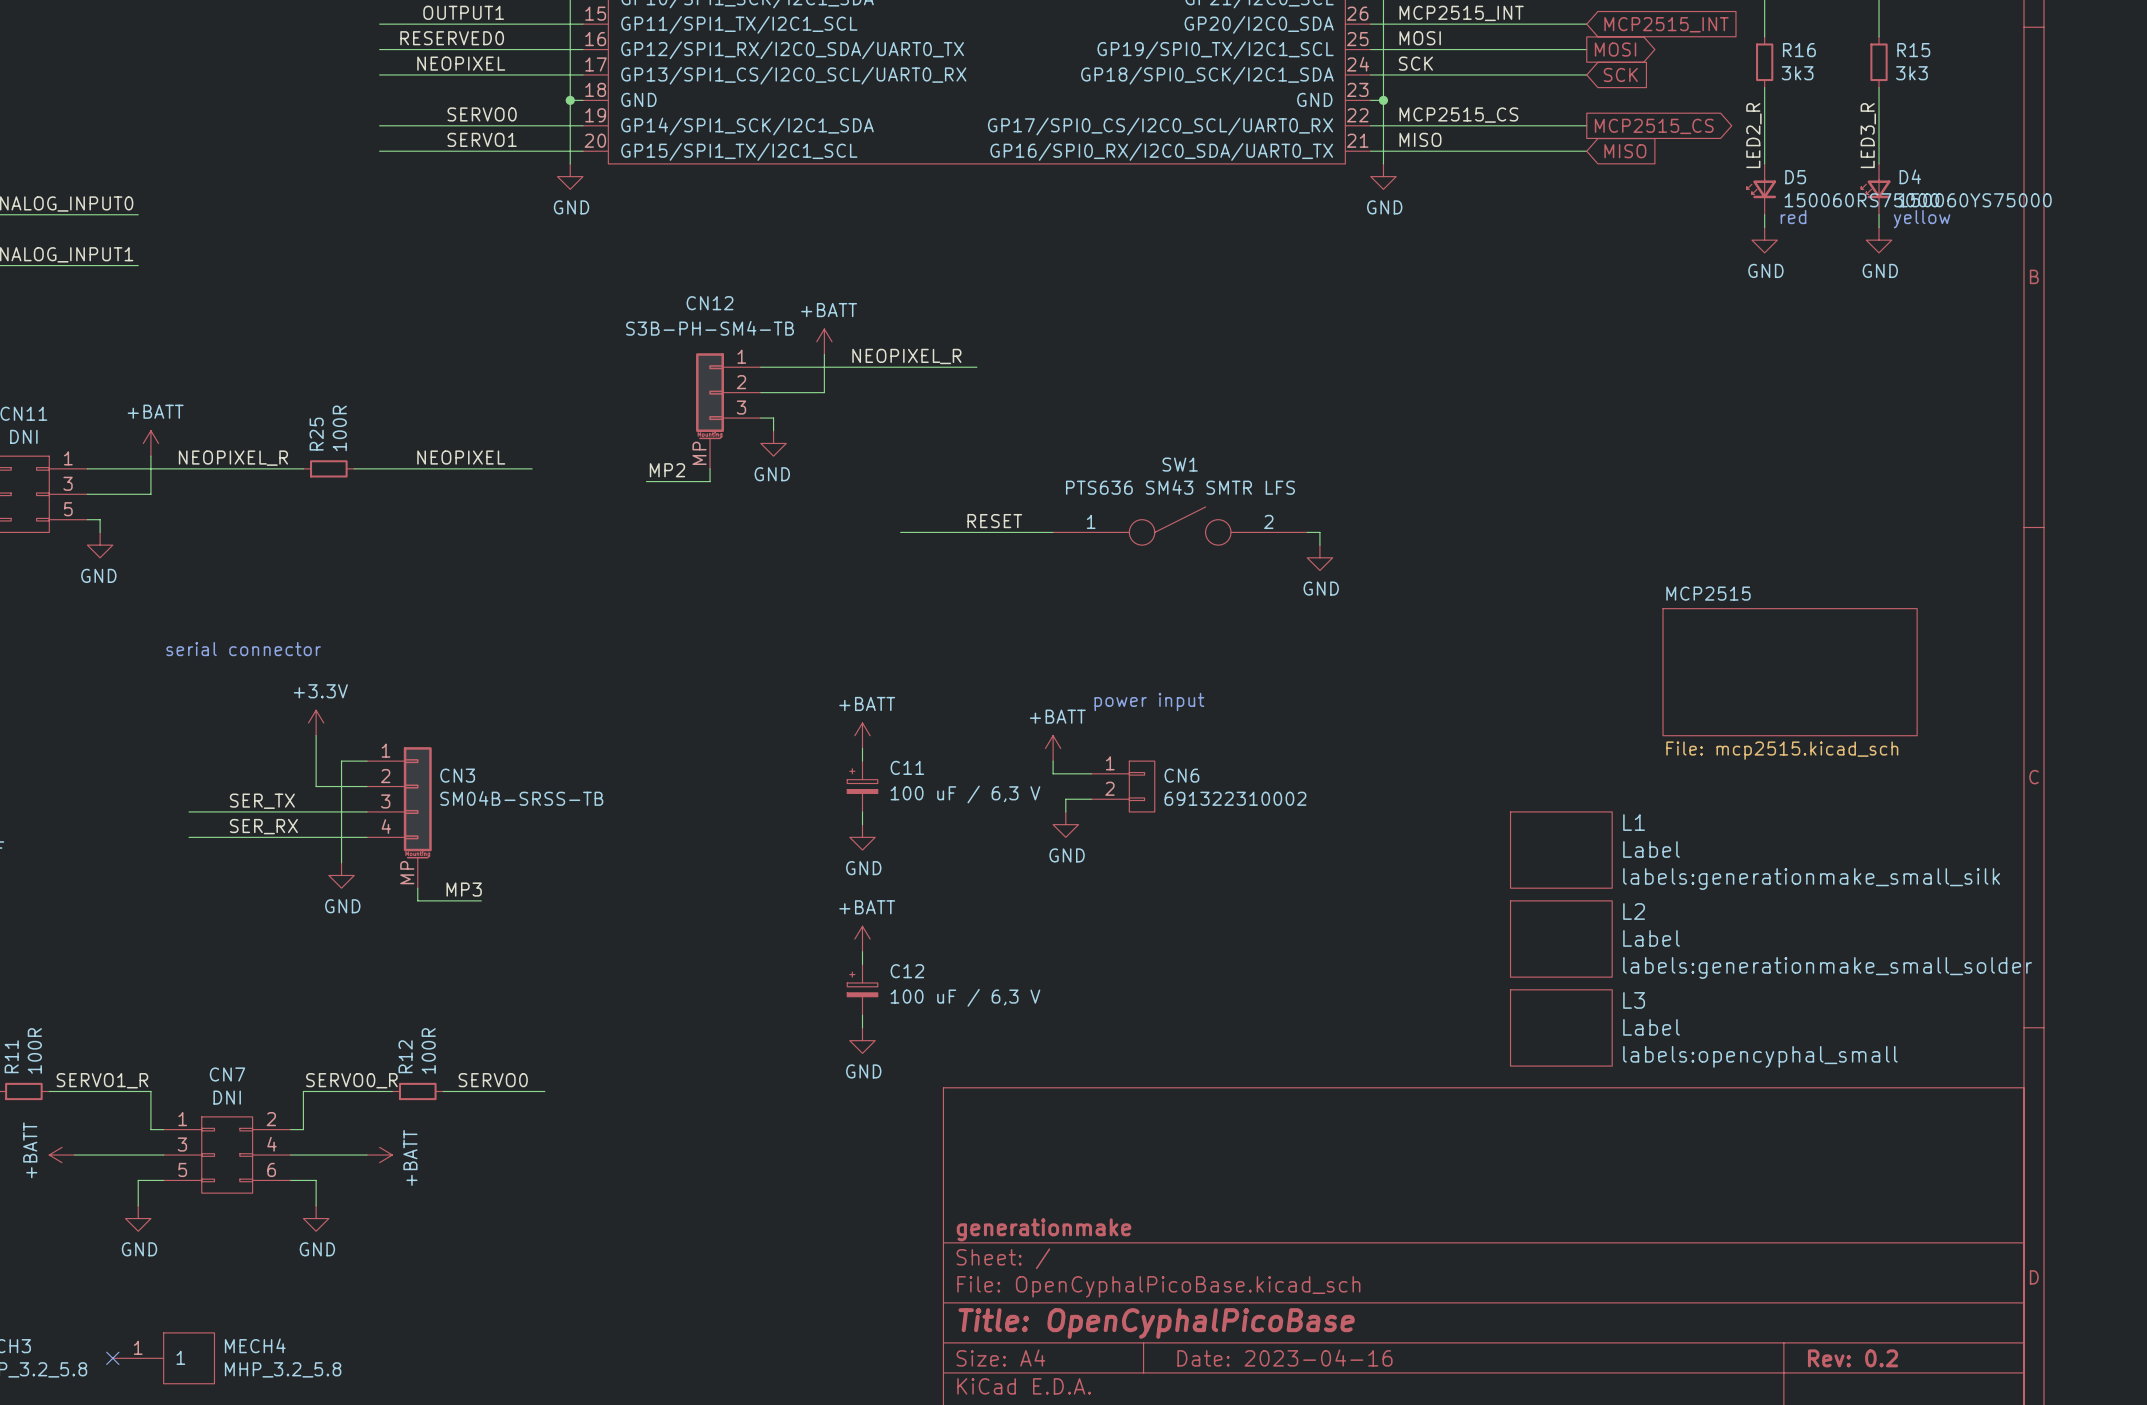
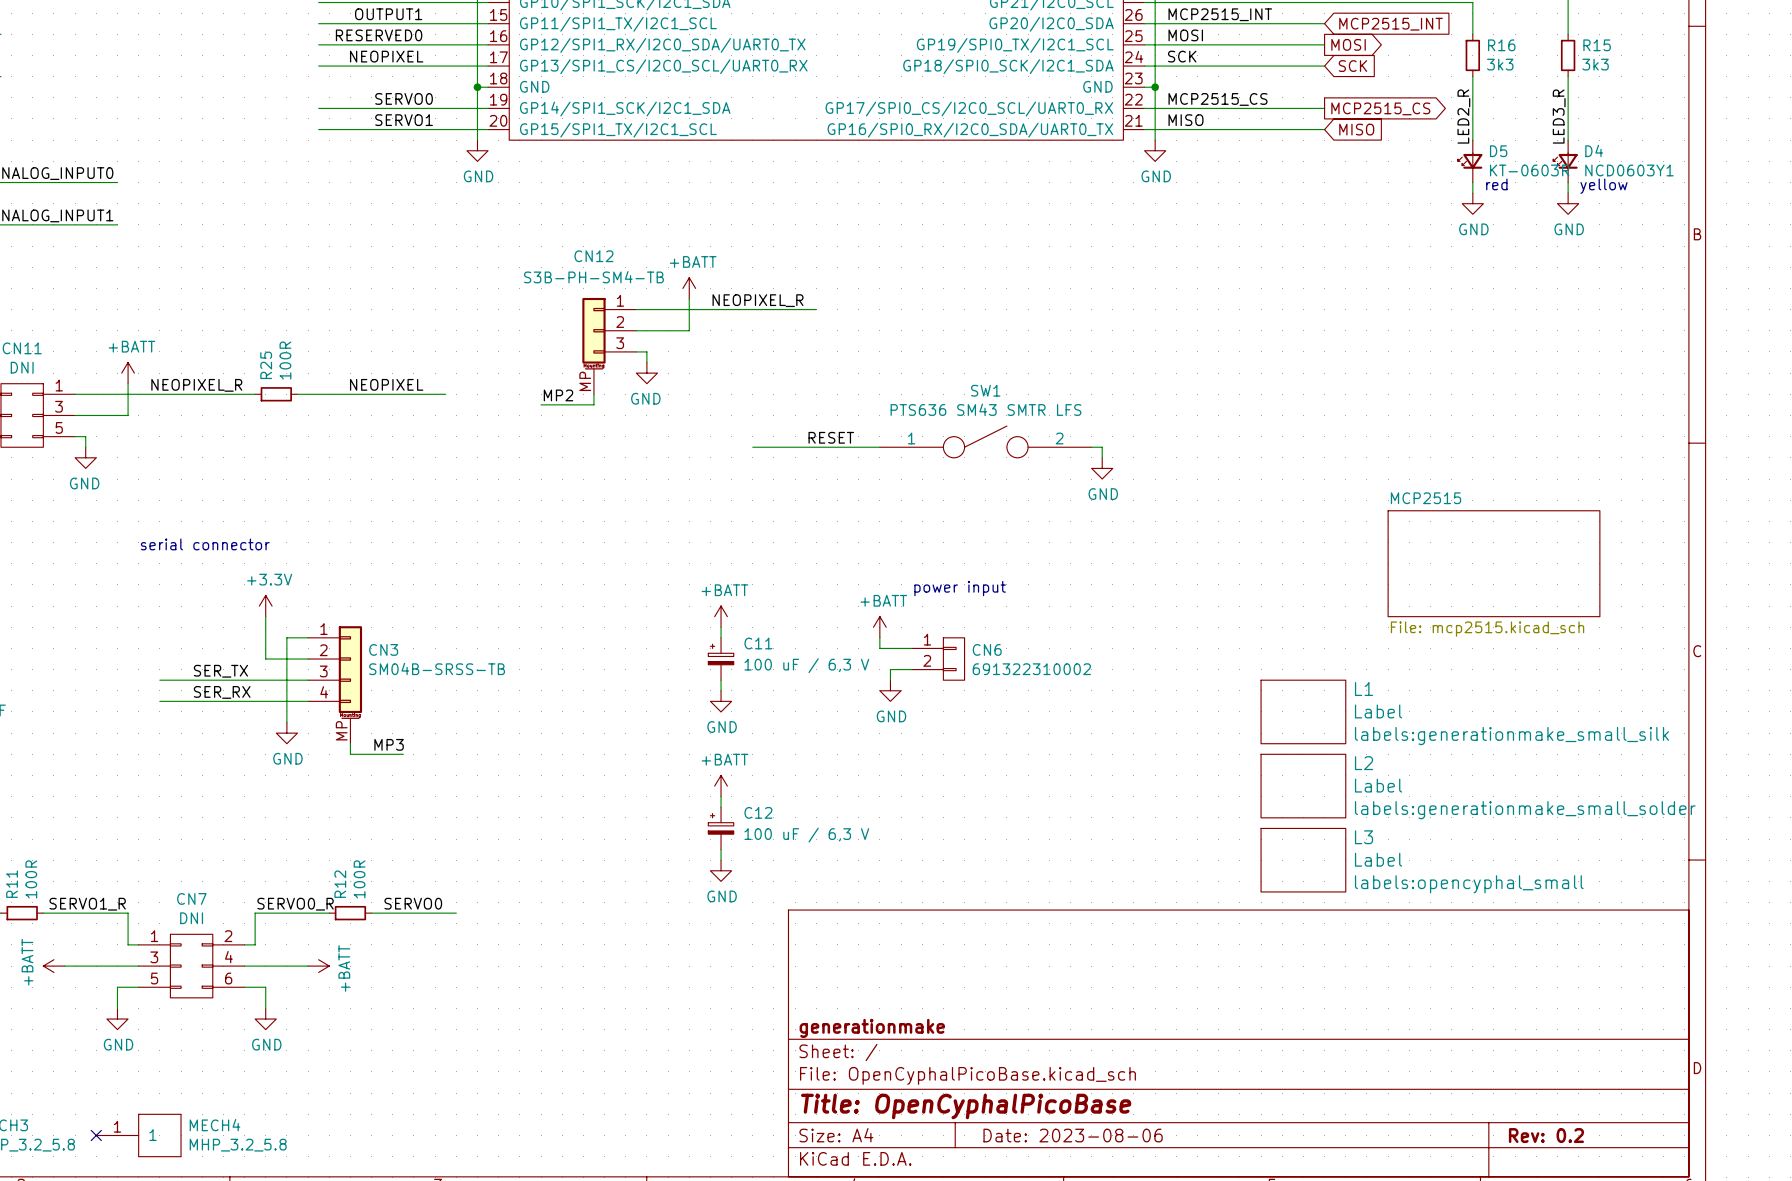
D5 value: 150060RS75000 (1861, 200) -> KT-0603R (1529, 170)
D4 value: 150060YS75000 (1975, 200) -> NCD0603Y1 (1629, 170)
title block: Date: 2023-04-16 (1284, 1358) -> Date: 2023-08-06 (1073, 1135)

